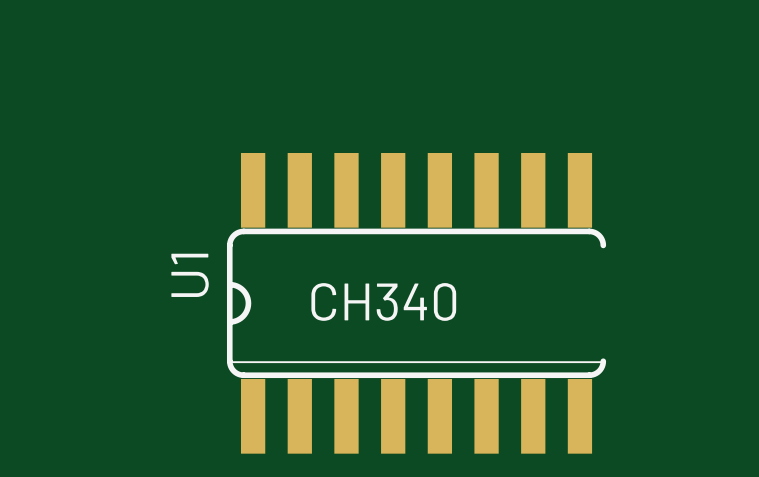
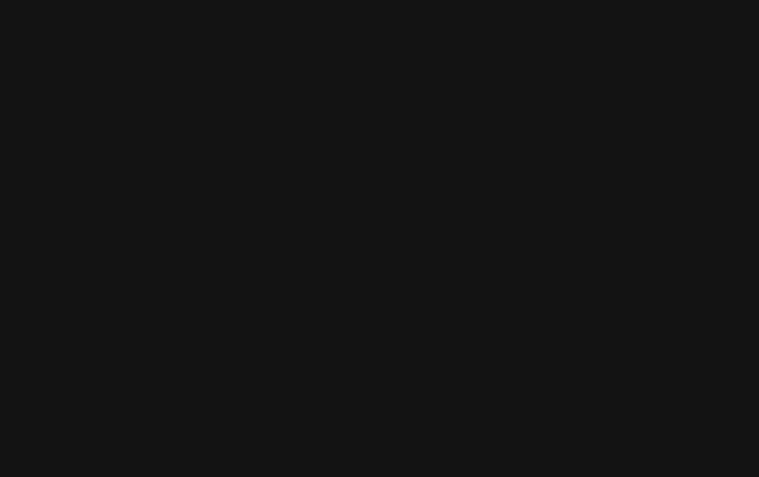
U1: CH340 (416, 303) -> none

